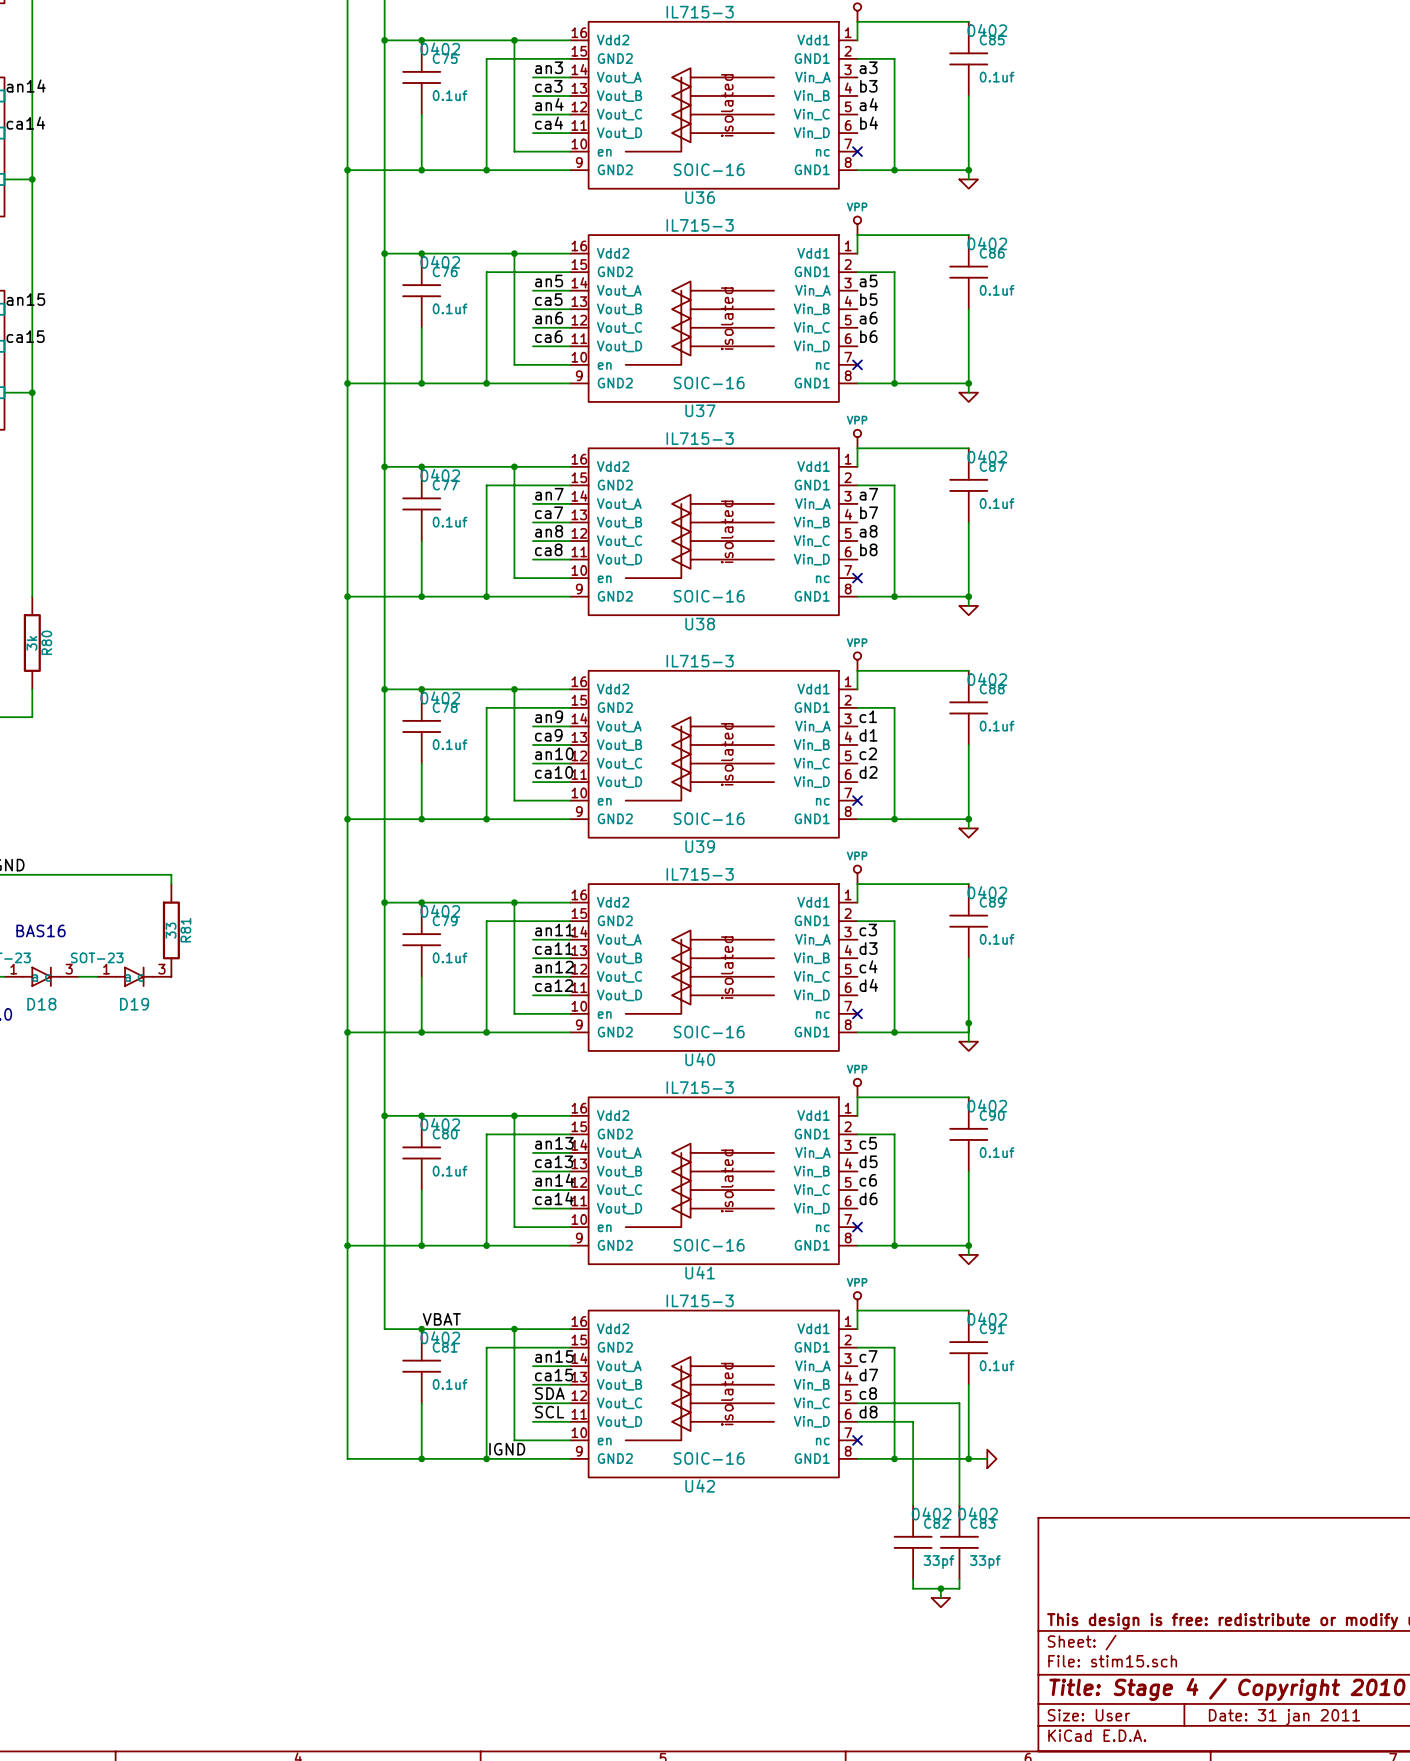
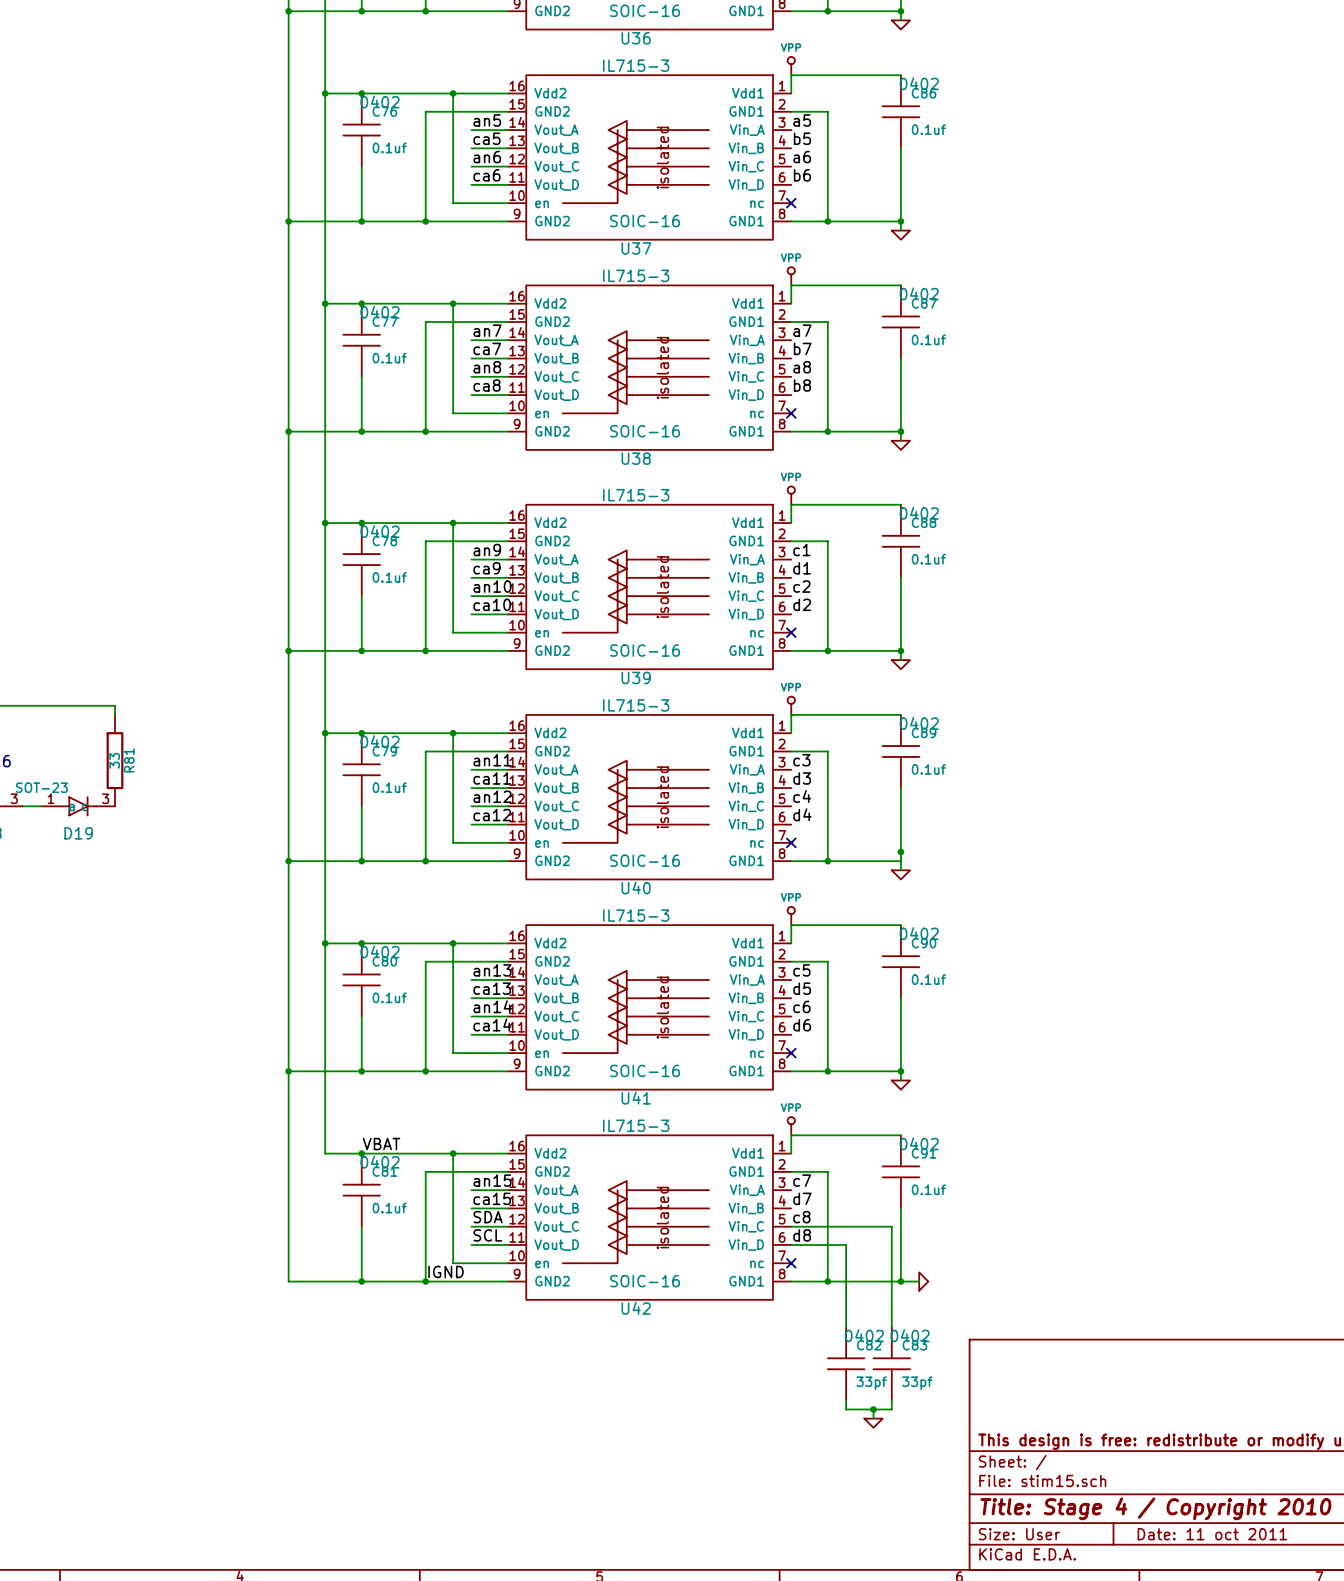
title block: Date: 31 jan 2011 (1284, 1717) -> Date: 11 oct 2011 (1212, 1534)

